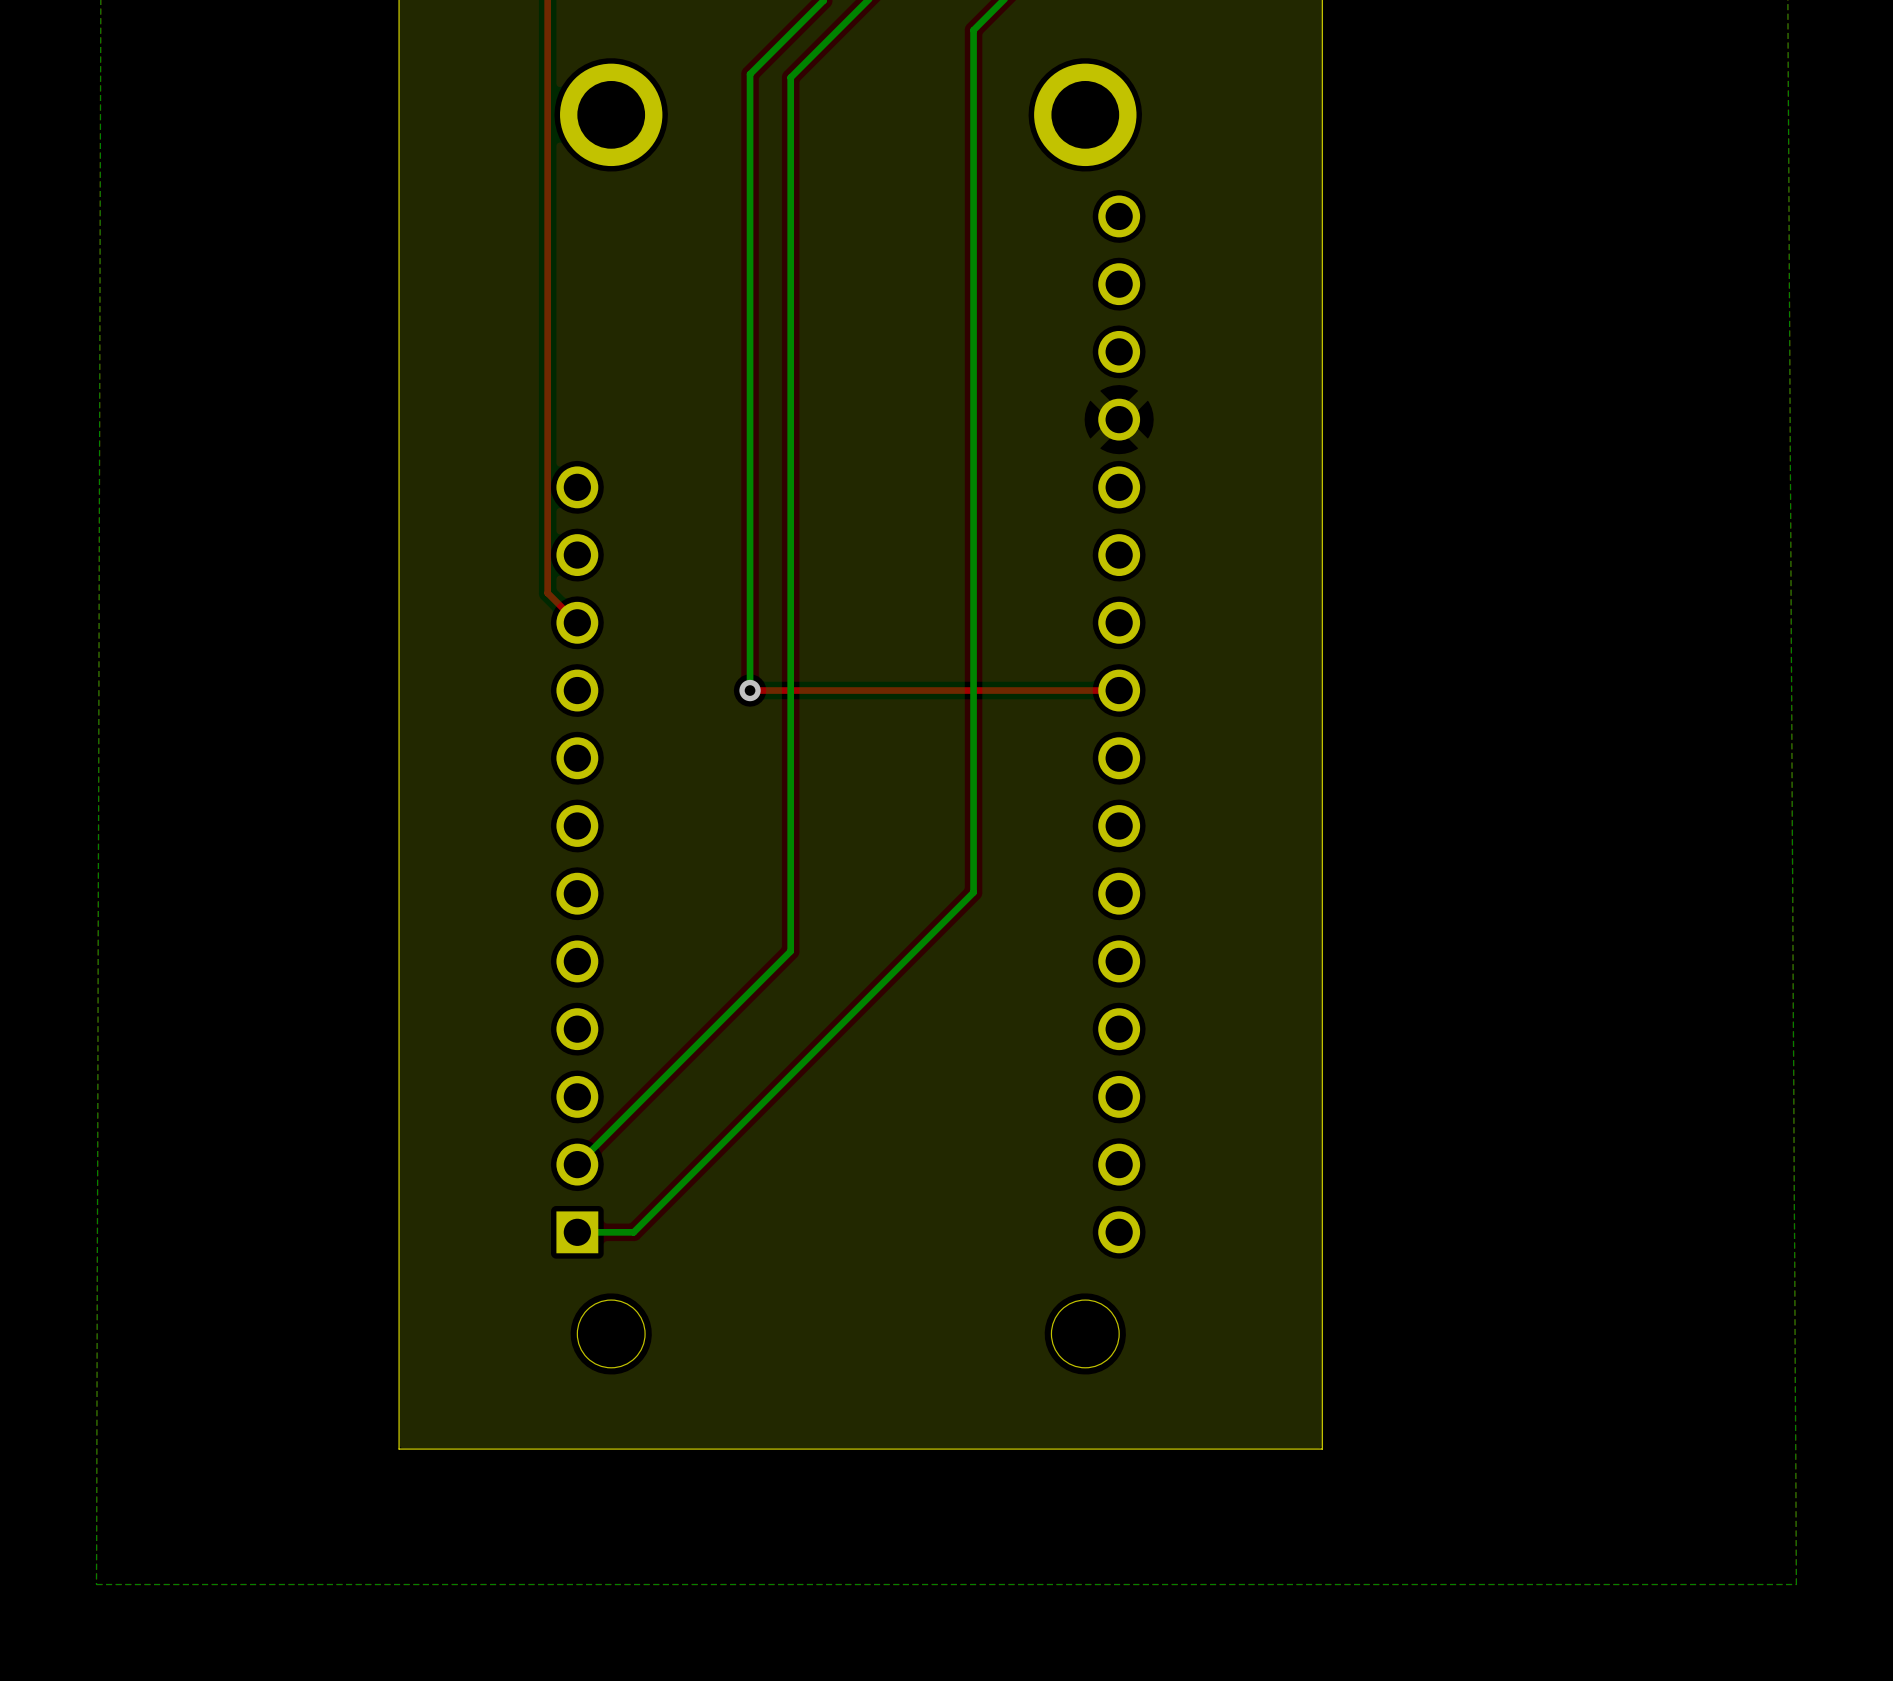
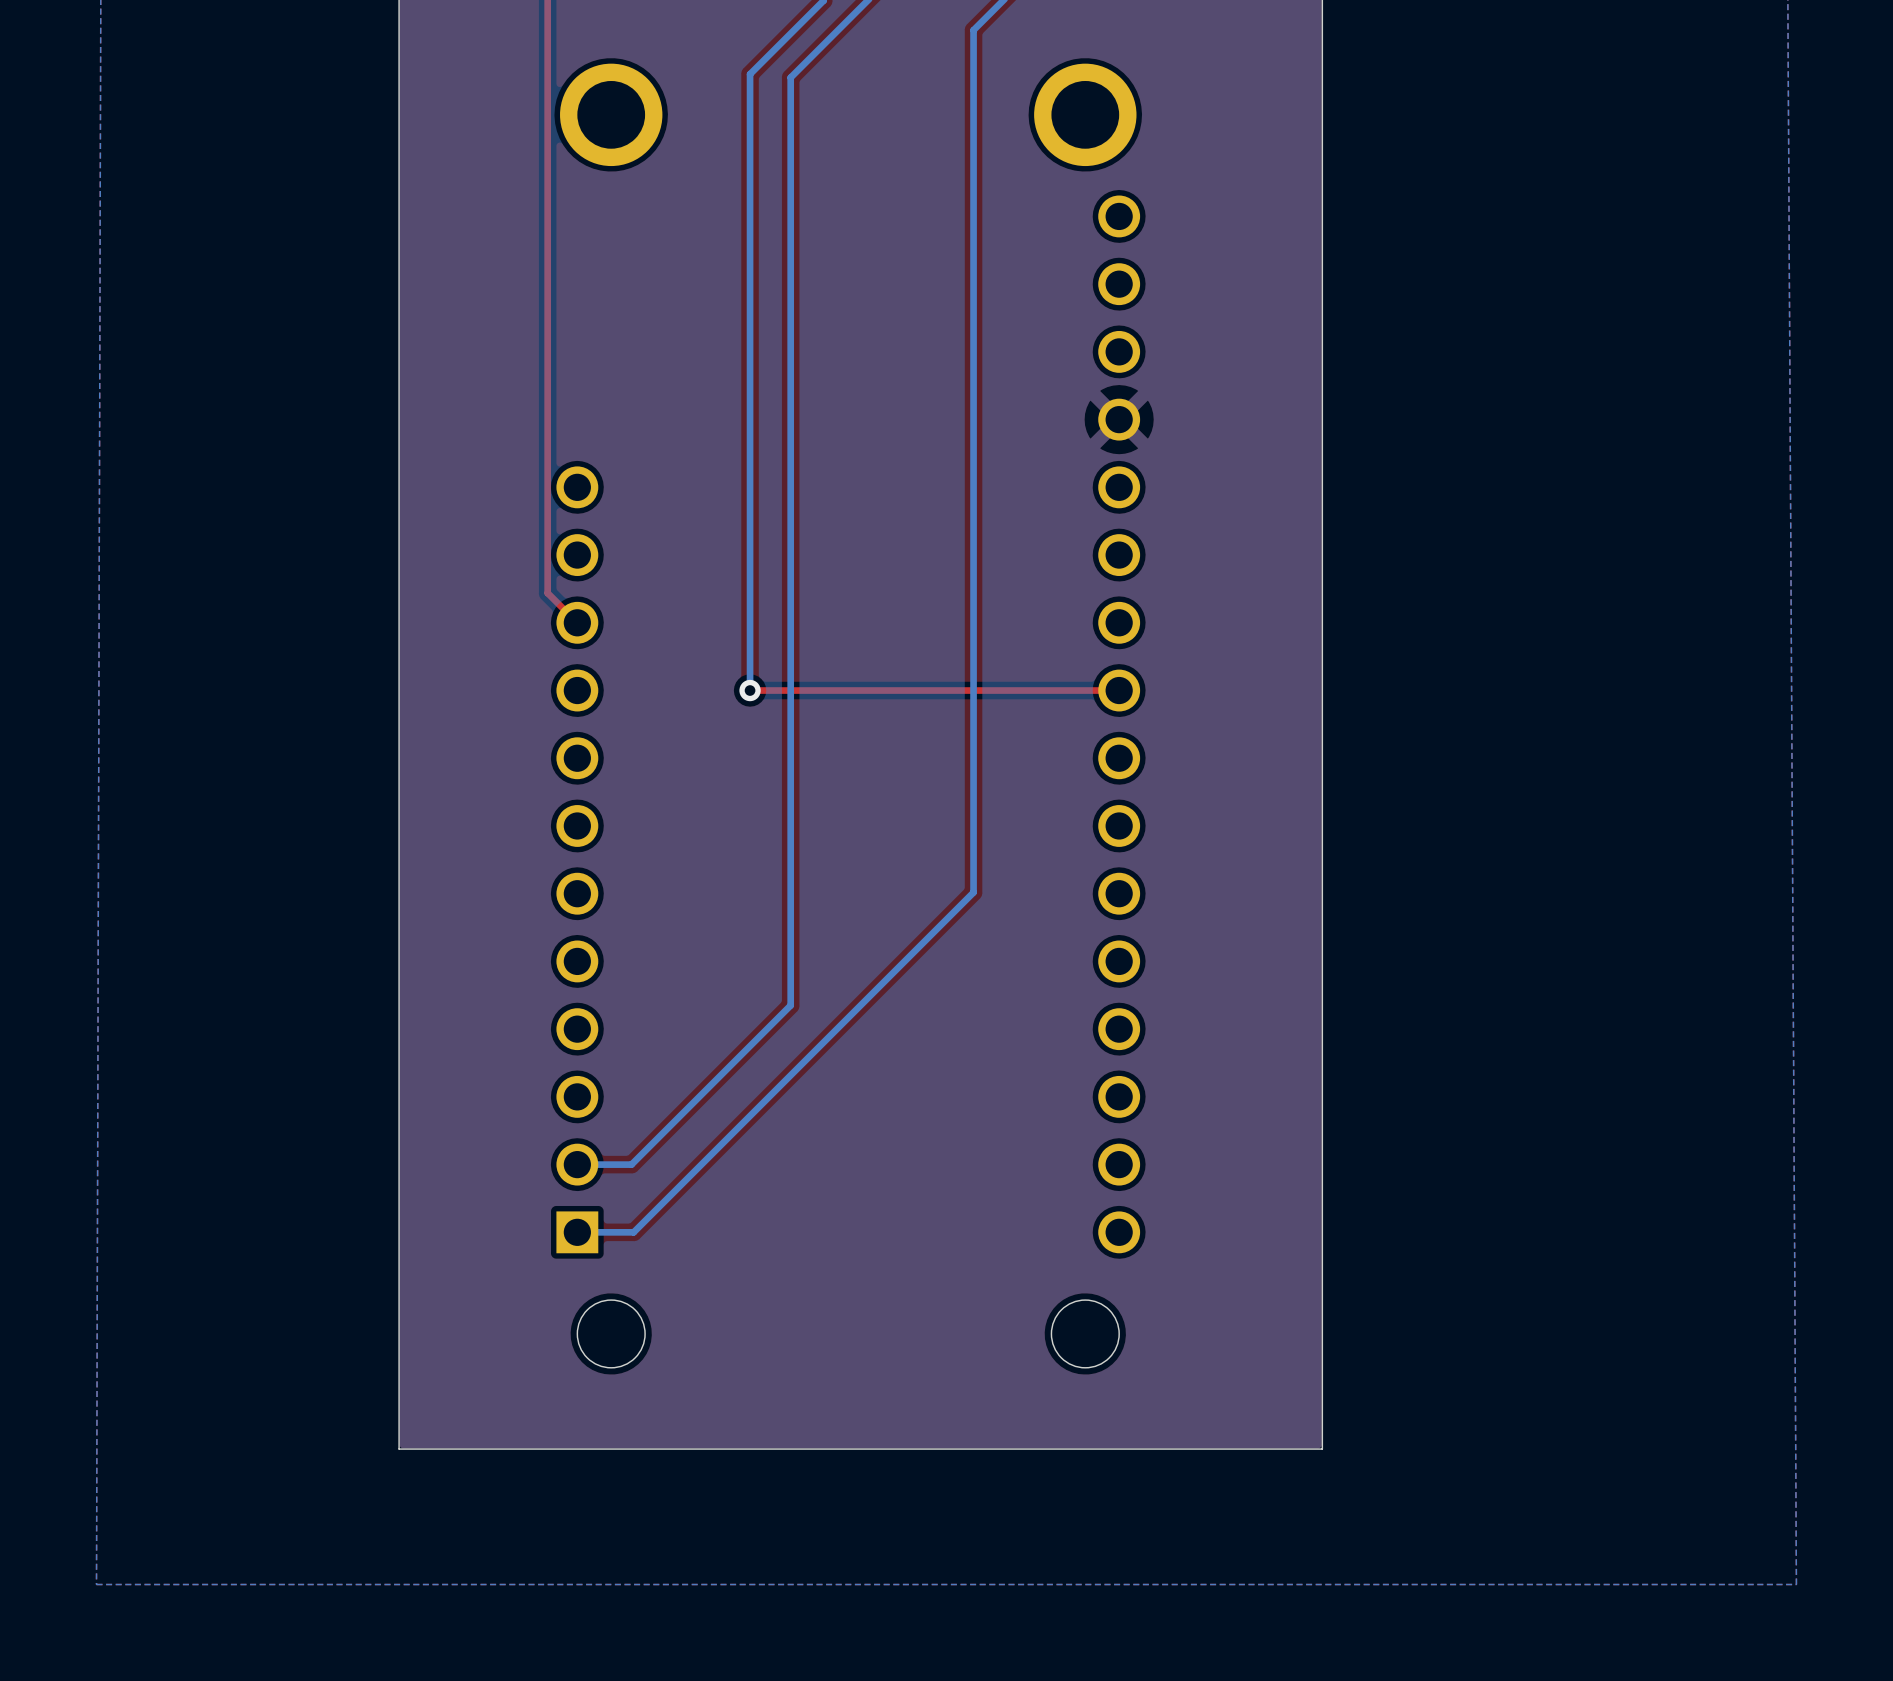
bottom track: (790, 951) (577, 1164) -> (790, 951) (790, 1005) (631, 1164) (577, 1164)

